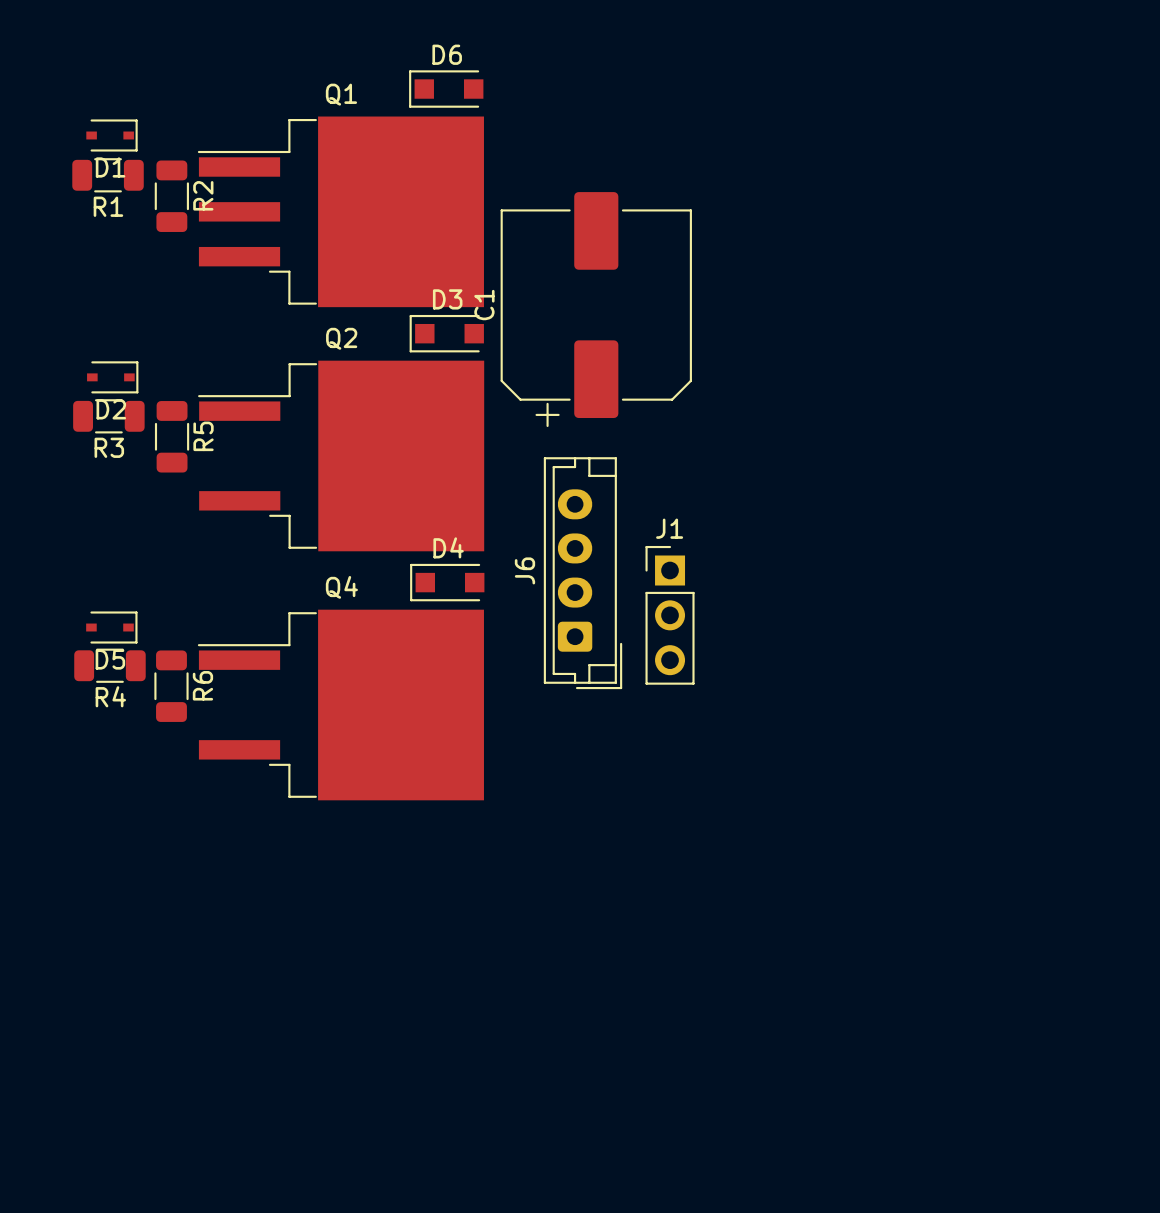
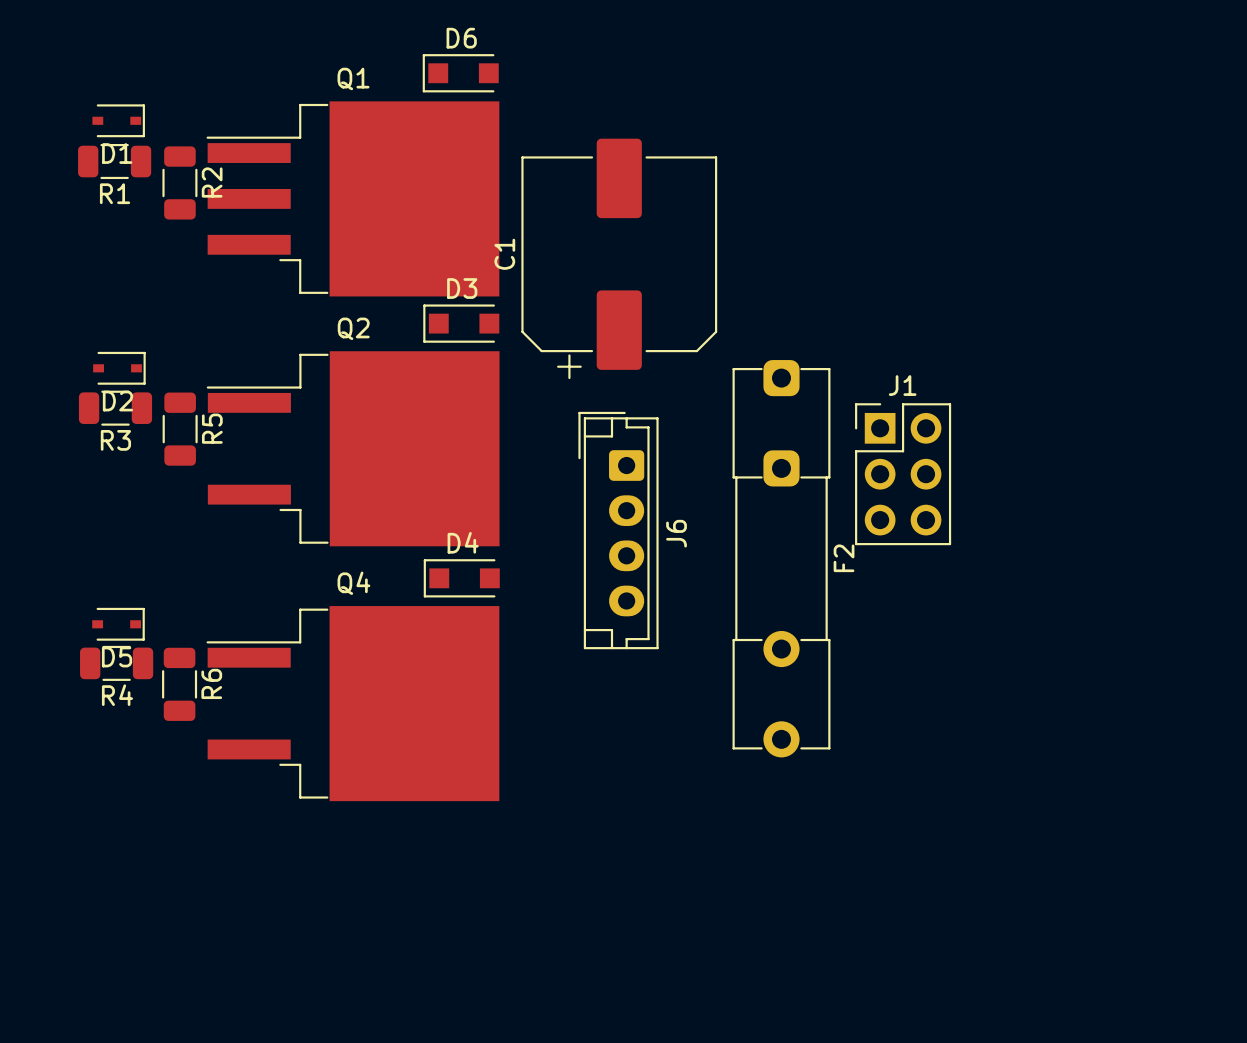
C1 position: (596, 309) -> (619, 258)
J1 footprint: [645, 545, 695, 685] -> [855, 403, 952, 546]
F2: none -> (781, 558)
J6 rotation: 0° (583, 573) -> 180° (618, 530)

